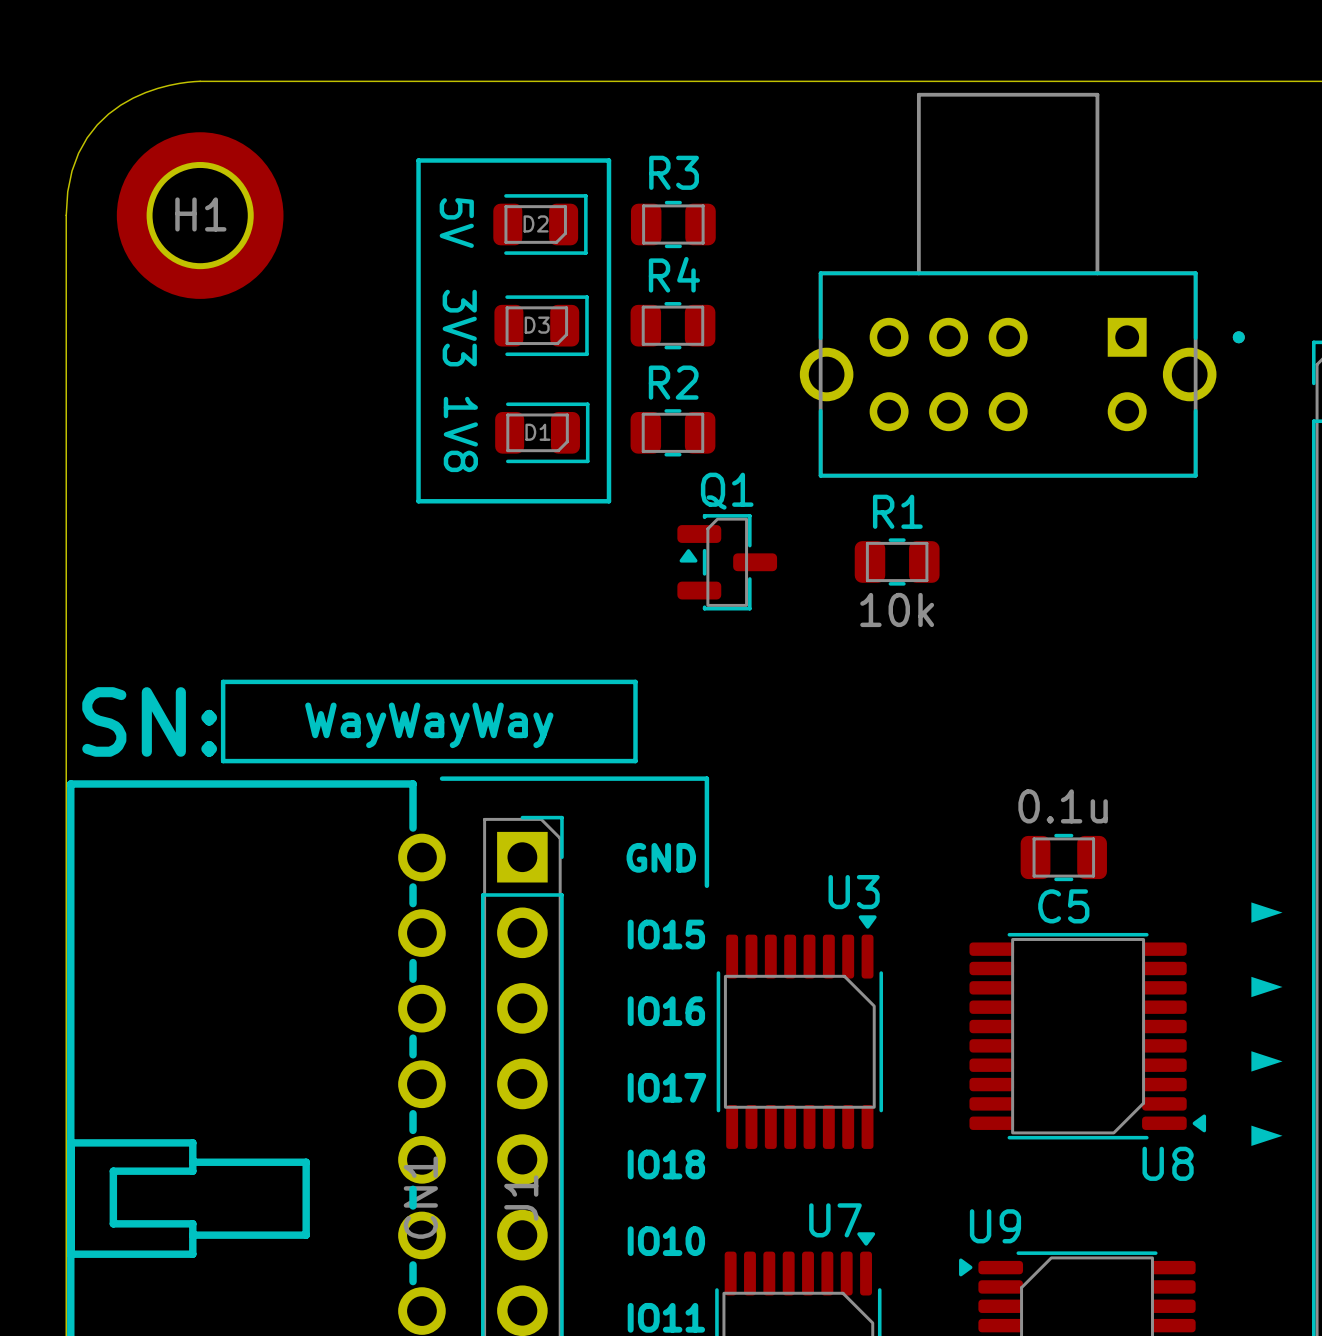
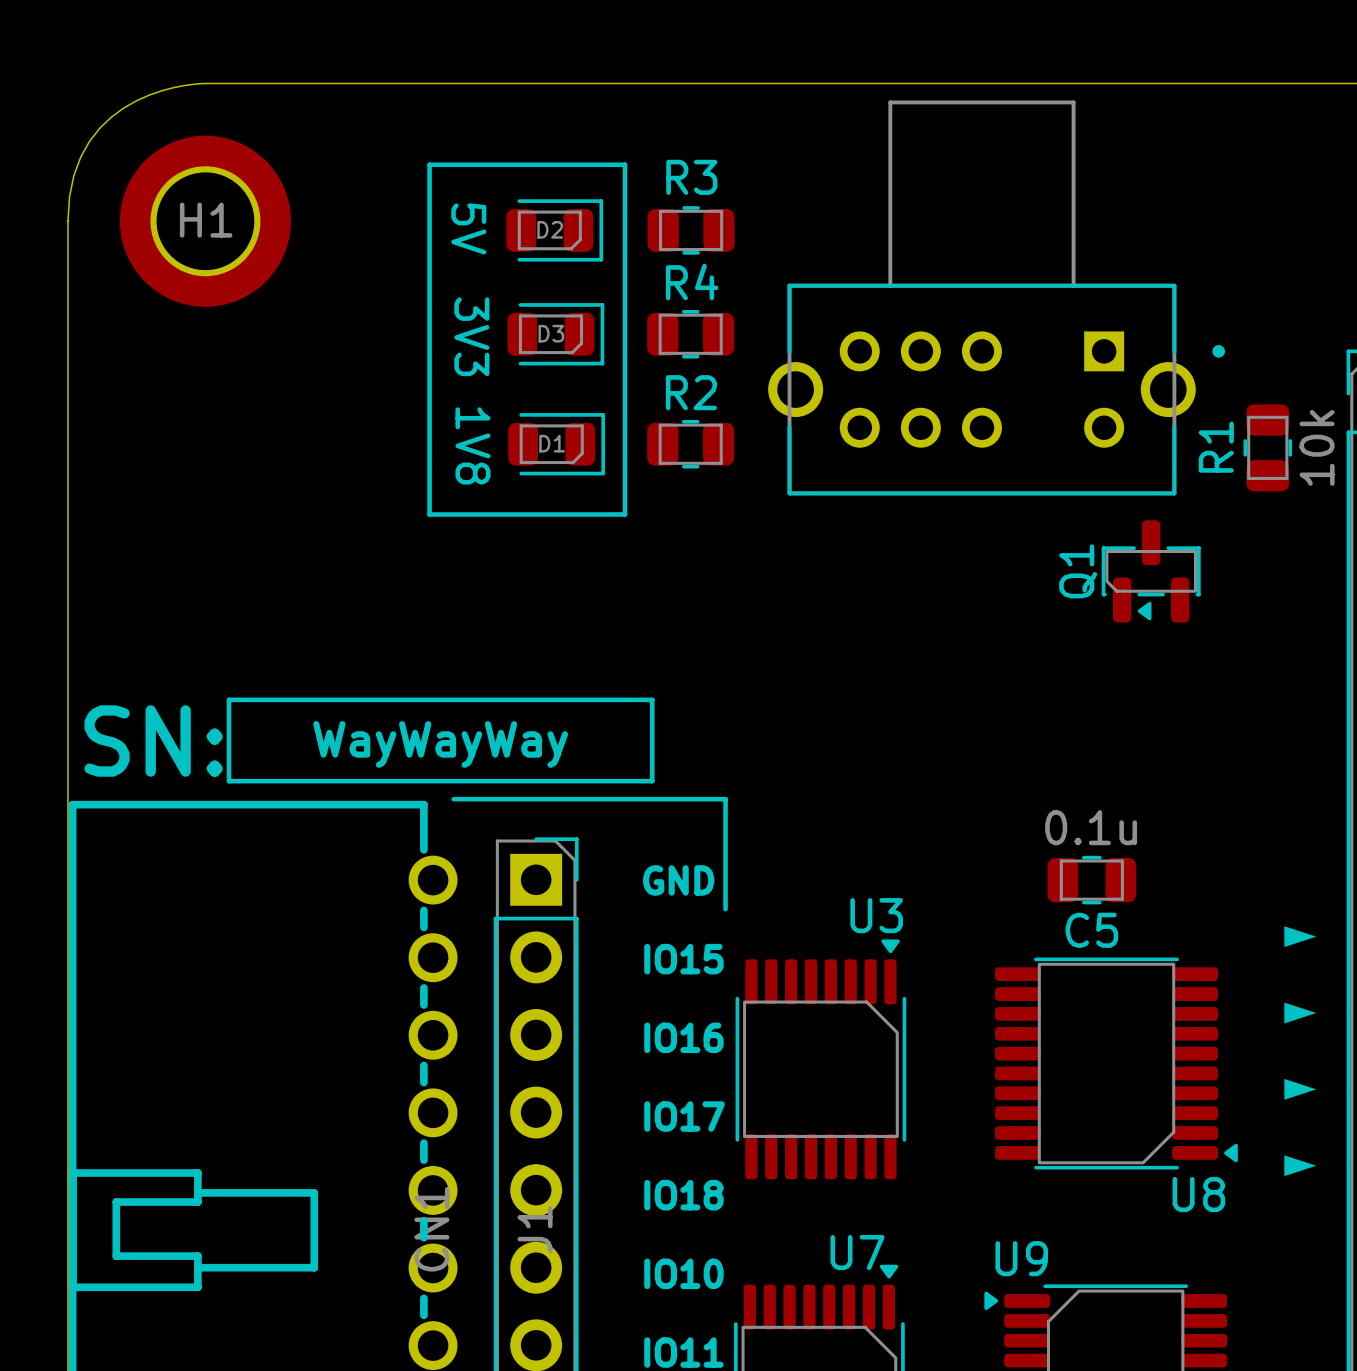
part position: (1022, 285) -> (996, 297)
R1 name position: R1 (897, 511) -> R1 (1216, 447)
R1 rotation: 0° (897, 561) -> 90° clockwise (1267, 447)
R1 position: (897, 561) -> (1267, 447)
Q1 rotation: 0° (727, 562) -> 90° counterclockwise (1151, 571)
Q1 position: (727, 562) -> (1151, 571)
R1 value position: 10k (897, 609) -> 10k (1317, 447)

